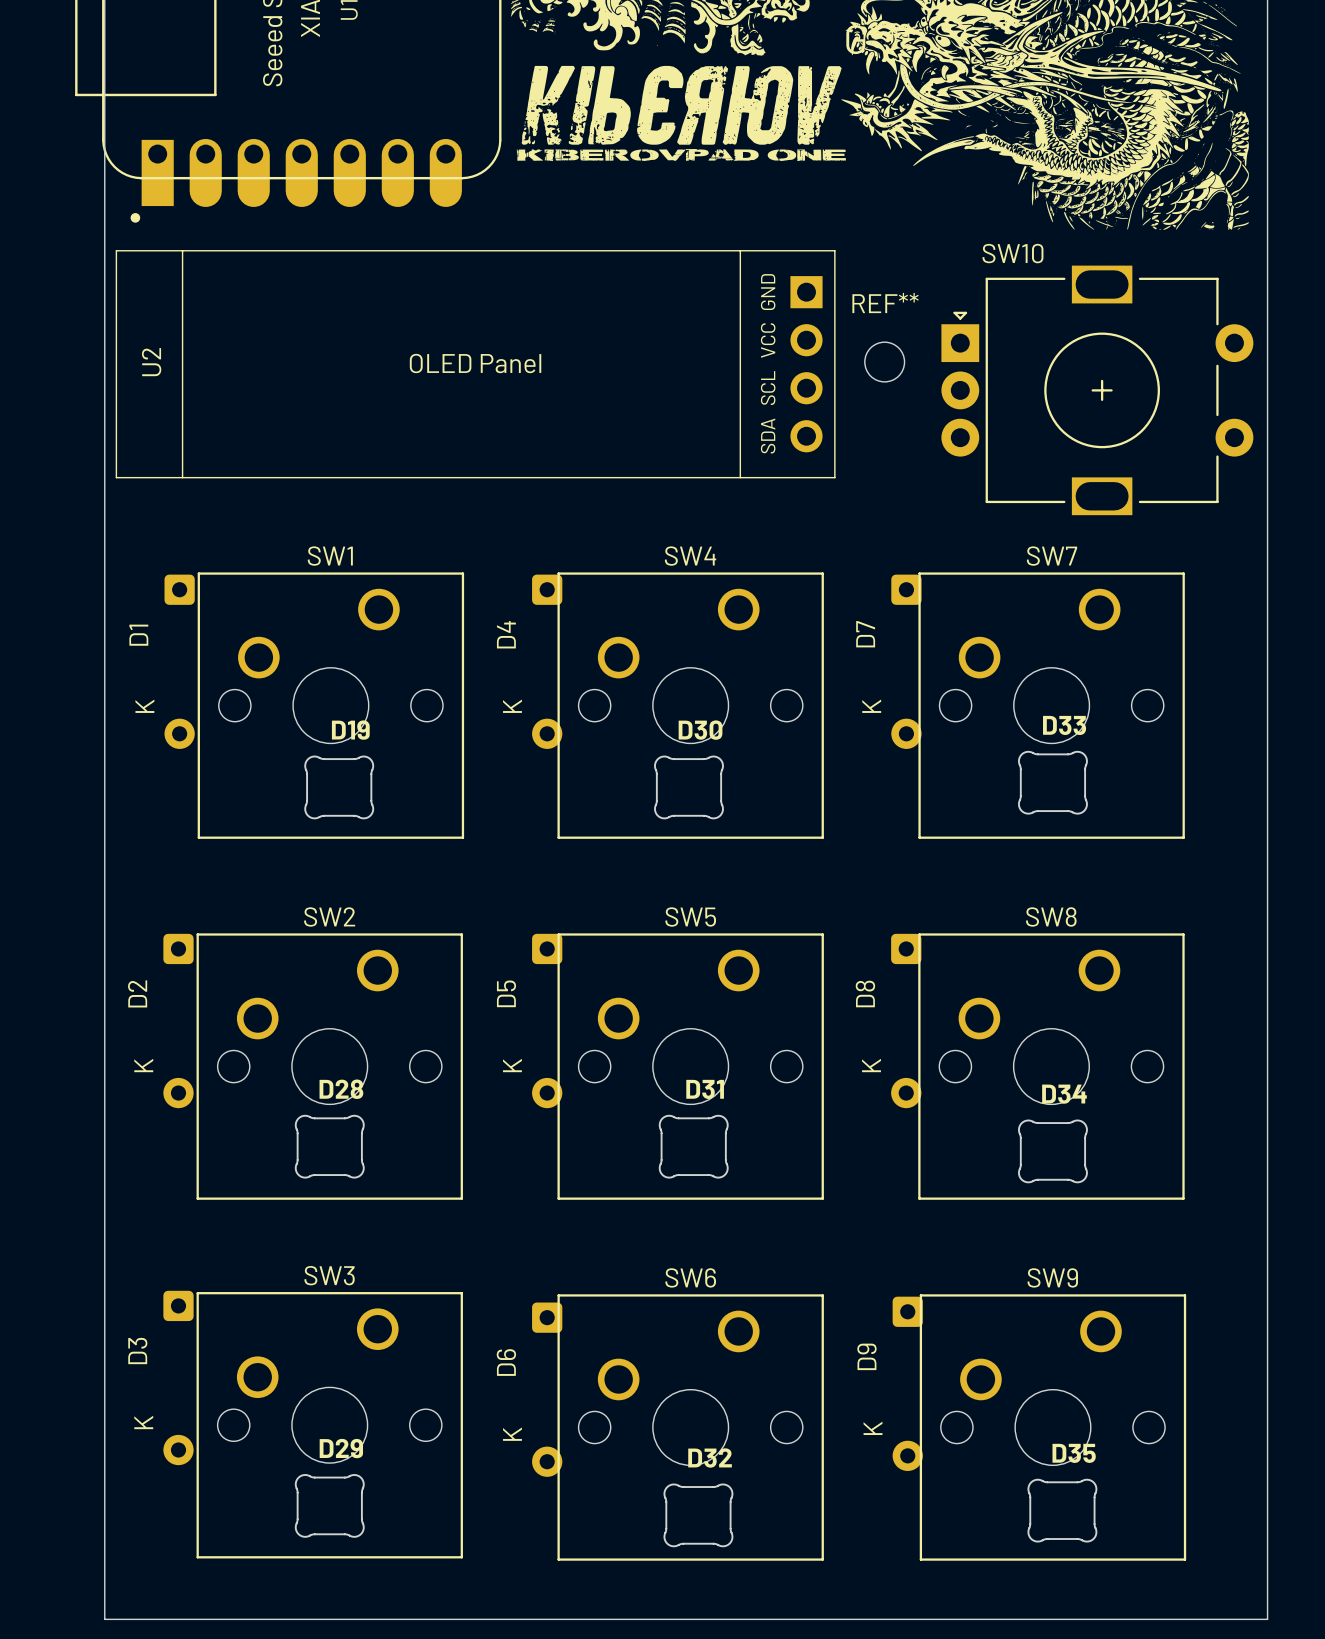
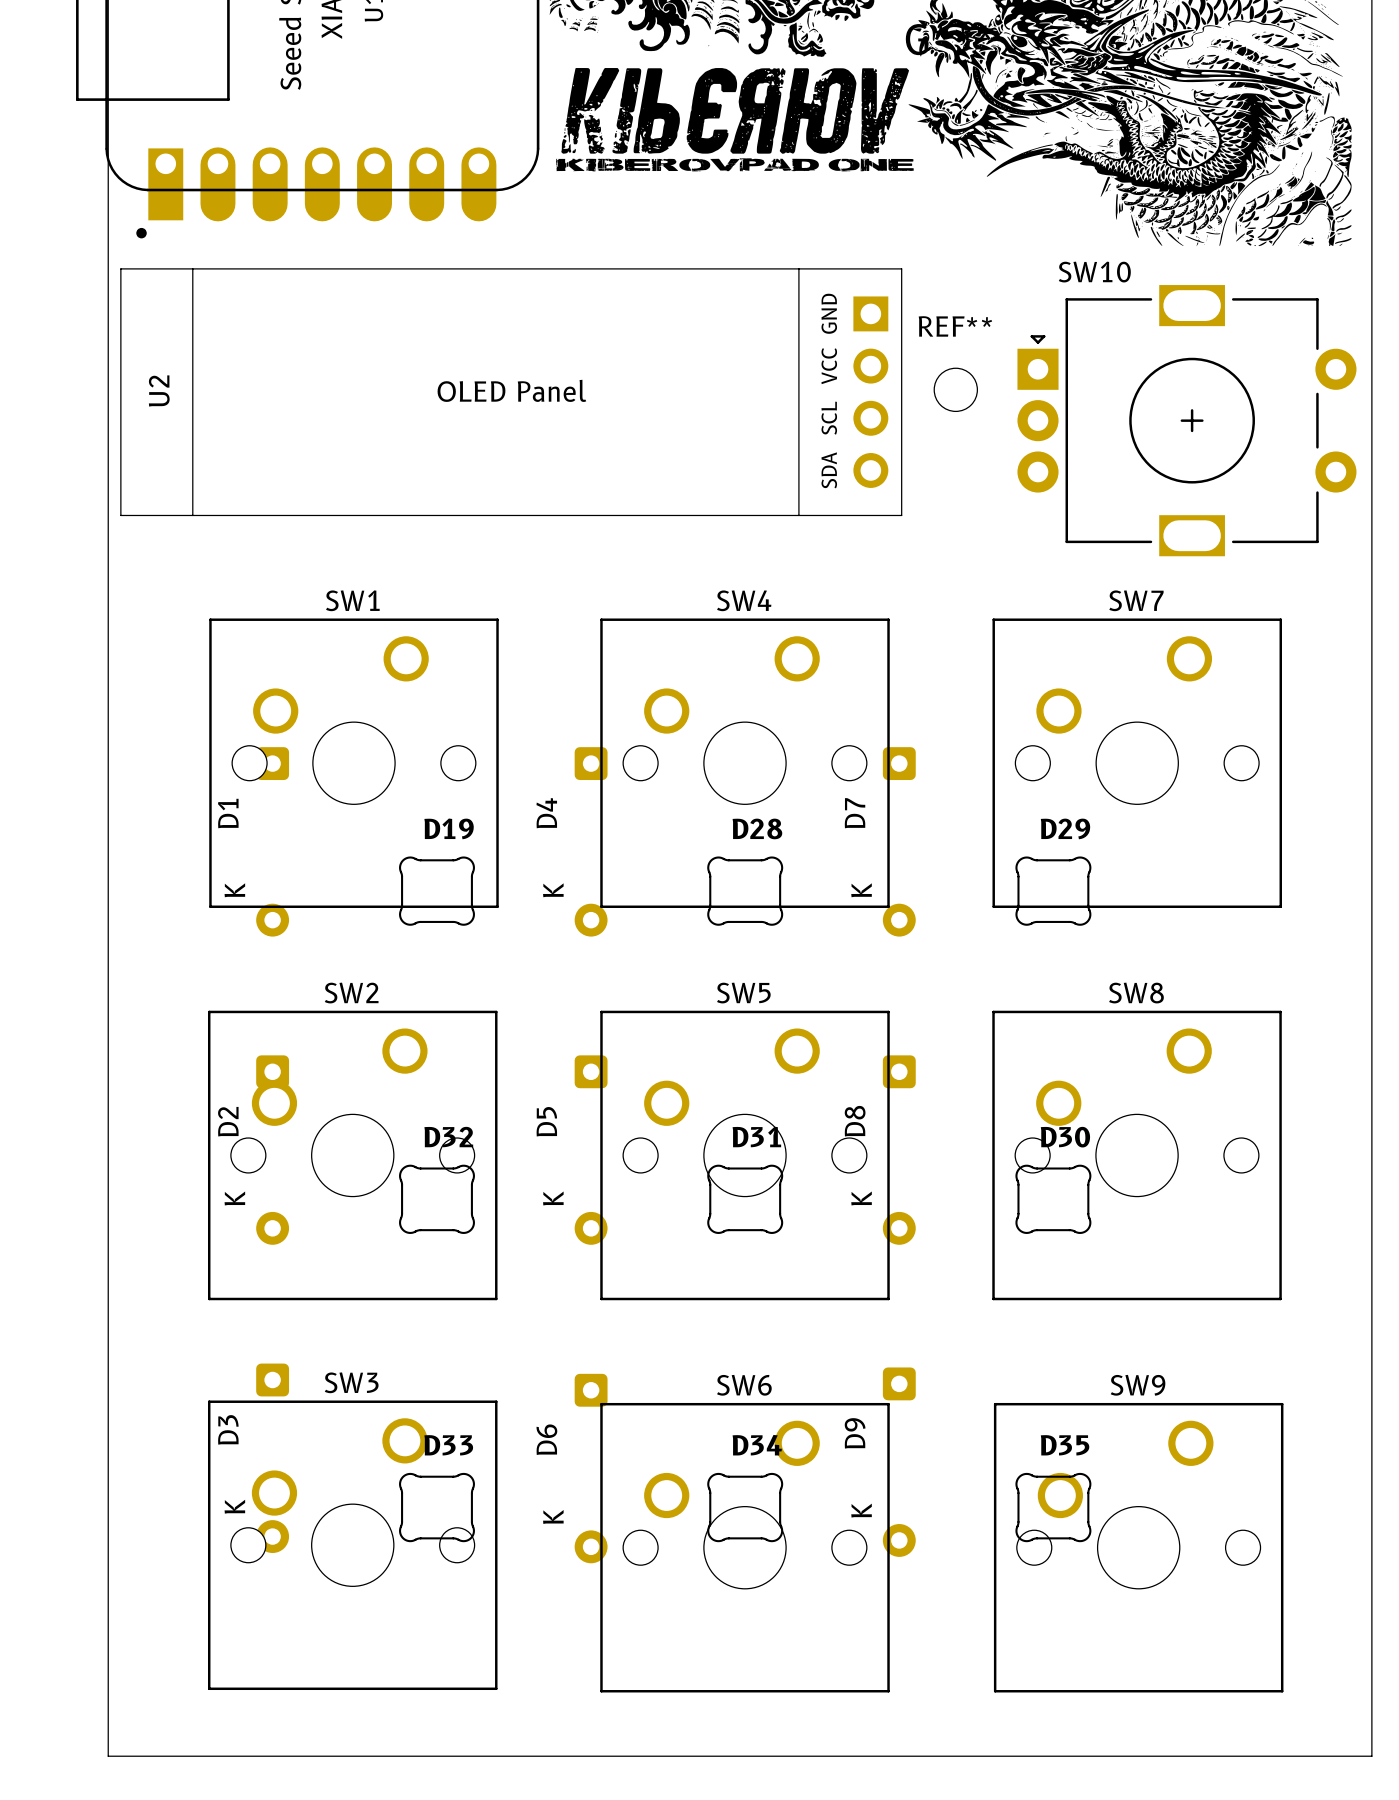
D1 position: (179, 661) -> (272, 841)
D4 position: (547, 661) -> (591, 841)
D7 position: (906, 661) -> (899, 841)
D33 position: (1052, 782) -> (436, 1507)
D19 position: (339, 787) -> (436, 891)
D30 position: (688, 787) -> (1053, 1199)
D2 position: (178, 1021) -> (272, 1150)
D5 position: (547, 1021) -> (591, 1150)
D8 position: (906, 1021) -> (899, 1150)
D28 position: (329, 1146) -> (745, 891)
D31 position: (693, 1146) -> (745, 1199)
D34 position: (1052, 1151) -> (745, 1507)
D3 position: (178, 1377) -> (272, 1458)
D9 position: (907, 1383) -> (899, 1462)
D6 position: (547, 1389) -> (591, 1468)
D29 position: (329, 1505) -> (1053, 891)
D35 position: (1062, 1510) -> (1053, 1507)
D32 position: (698, 1515) -> (436, 1199)

